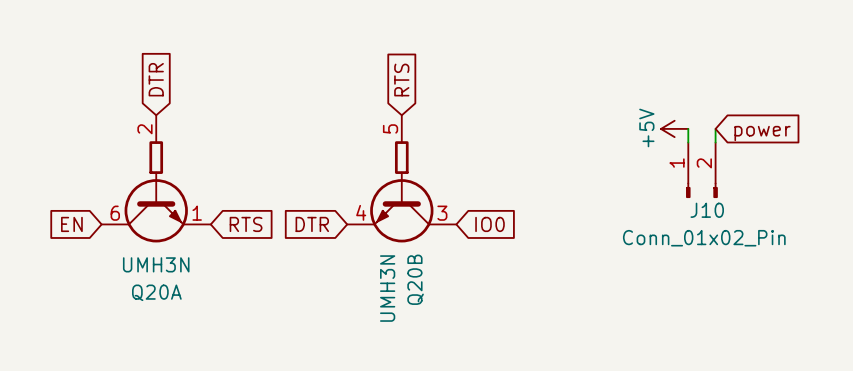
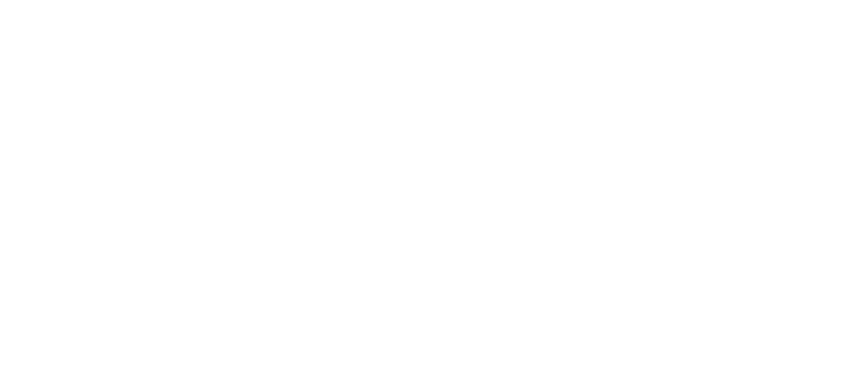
global label: DTR (156, 79) -> none
global label: RTS (401, 80) -> none
power symbol: +5V (674, 128) -> none
wire: (688, 128) (688, 142) -> none
wire: (715, 128) (715, 142) -> none
global label: power (762, 133) -> none
J10: Conn_01x02_Pin (701, 170) -> none
Q20A: UMH3N (156, 178) -> none
Q20B: UMH3N (401, 178) -> none
global label: EN (71, 224) -> none
global label: RTS (246, 224) -> none
global label: DTR (312, 224) -> none
global label: IO0 (490, 224) -> none

